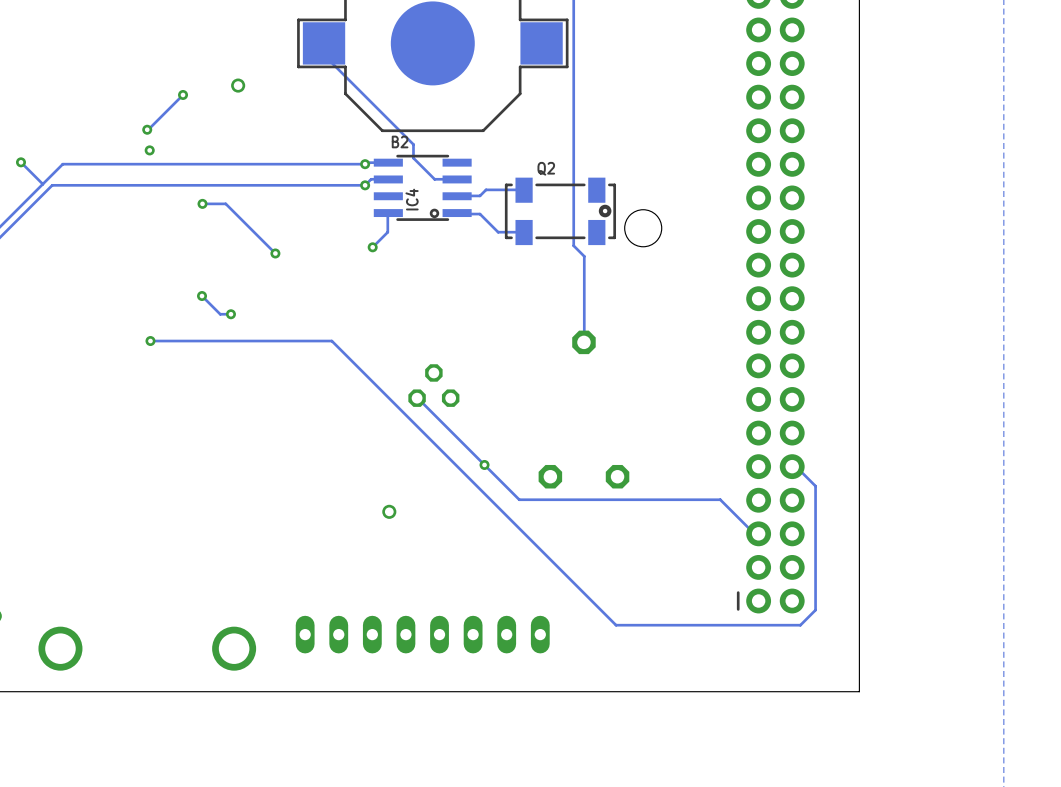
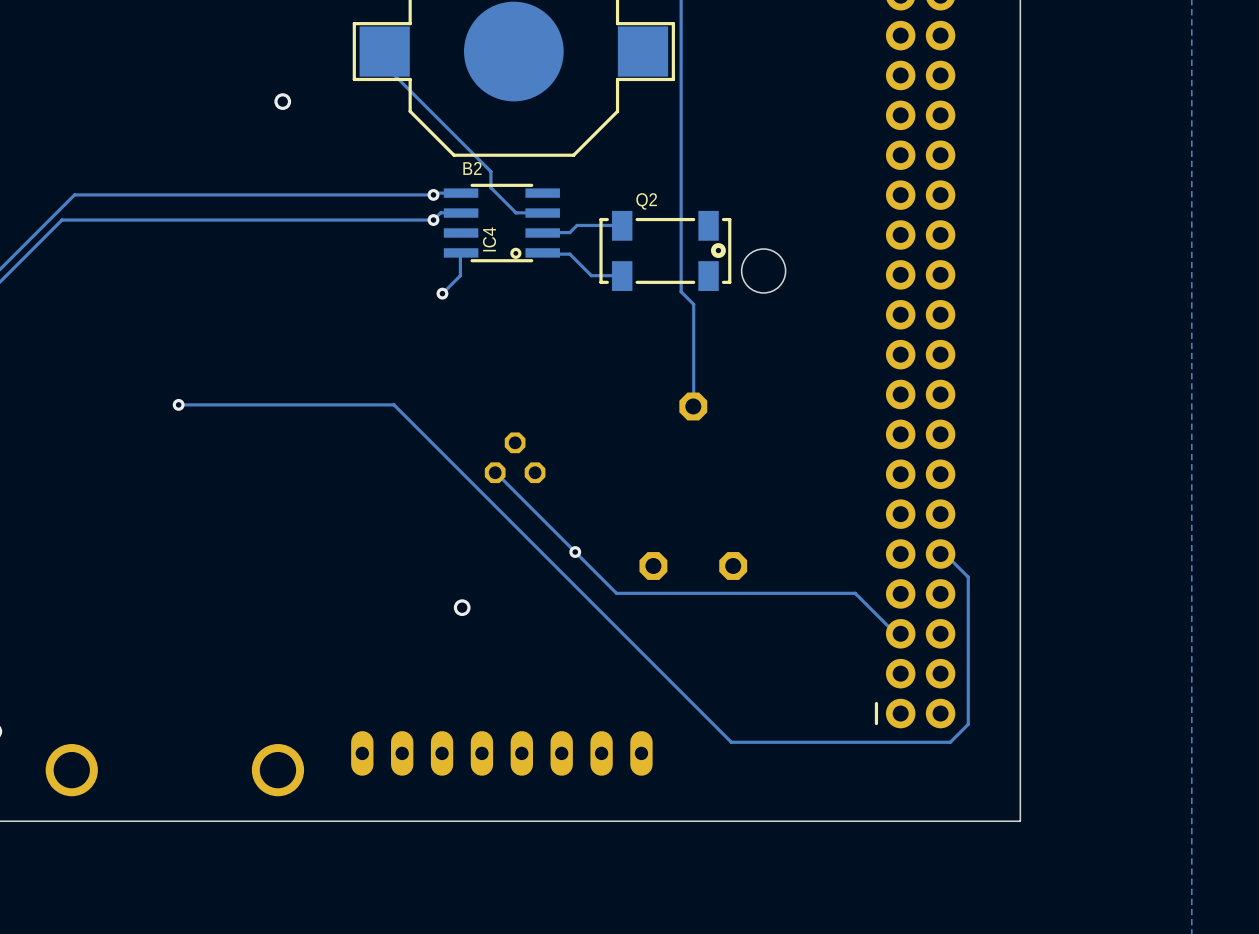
track: (183, 94) (147, 129) -> none
via: (183, 94) -> none
via: (147, 129) -> none
via: (149, 150) -> none
track: (20, 162) (42, 184) -> none
via: (20, 162) -> none
track: (202, 203) (225, 203) (275, 253) -> none
via: (202, 203) -> none
via: (275, 253) -> none
track: (202, 296) (220, 314) (230, 314) -> none
via: (202, 296) -> none
via: (230, 314) -> none

